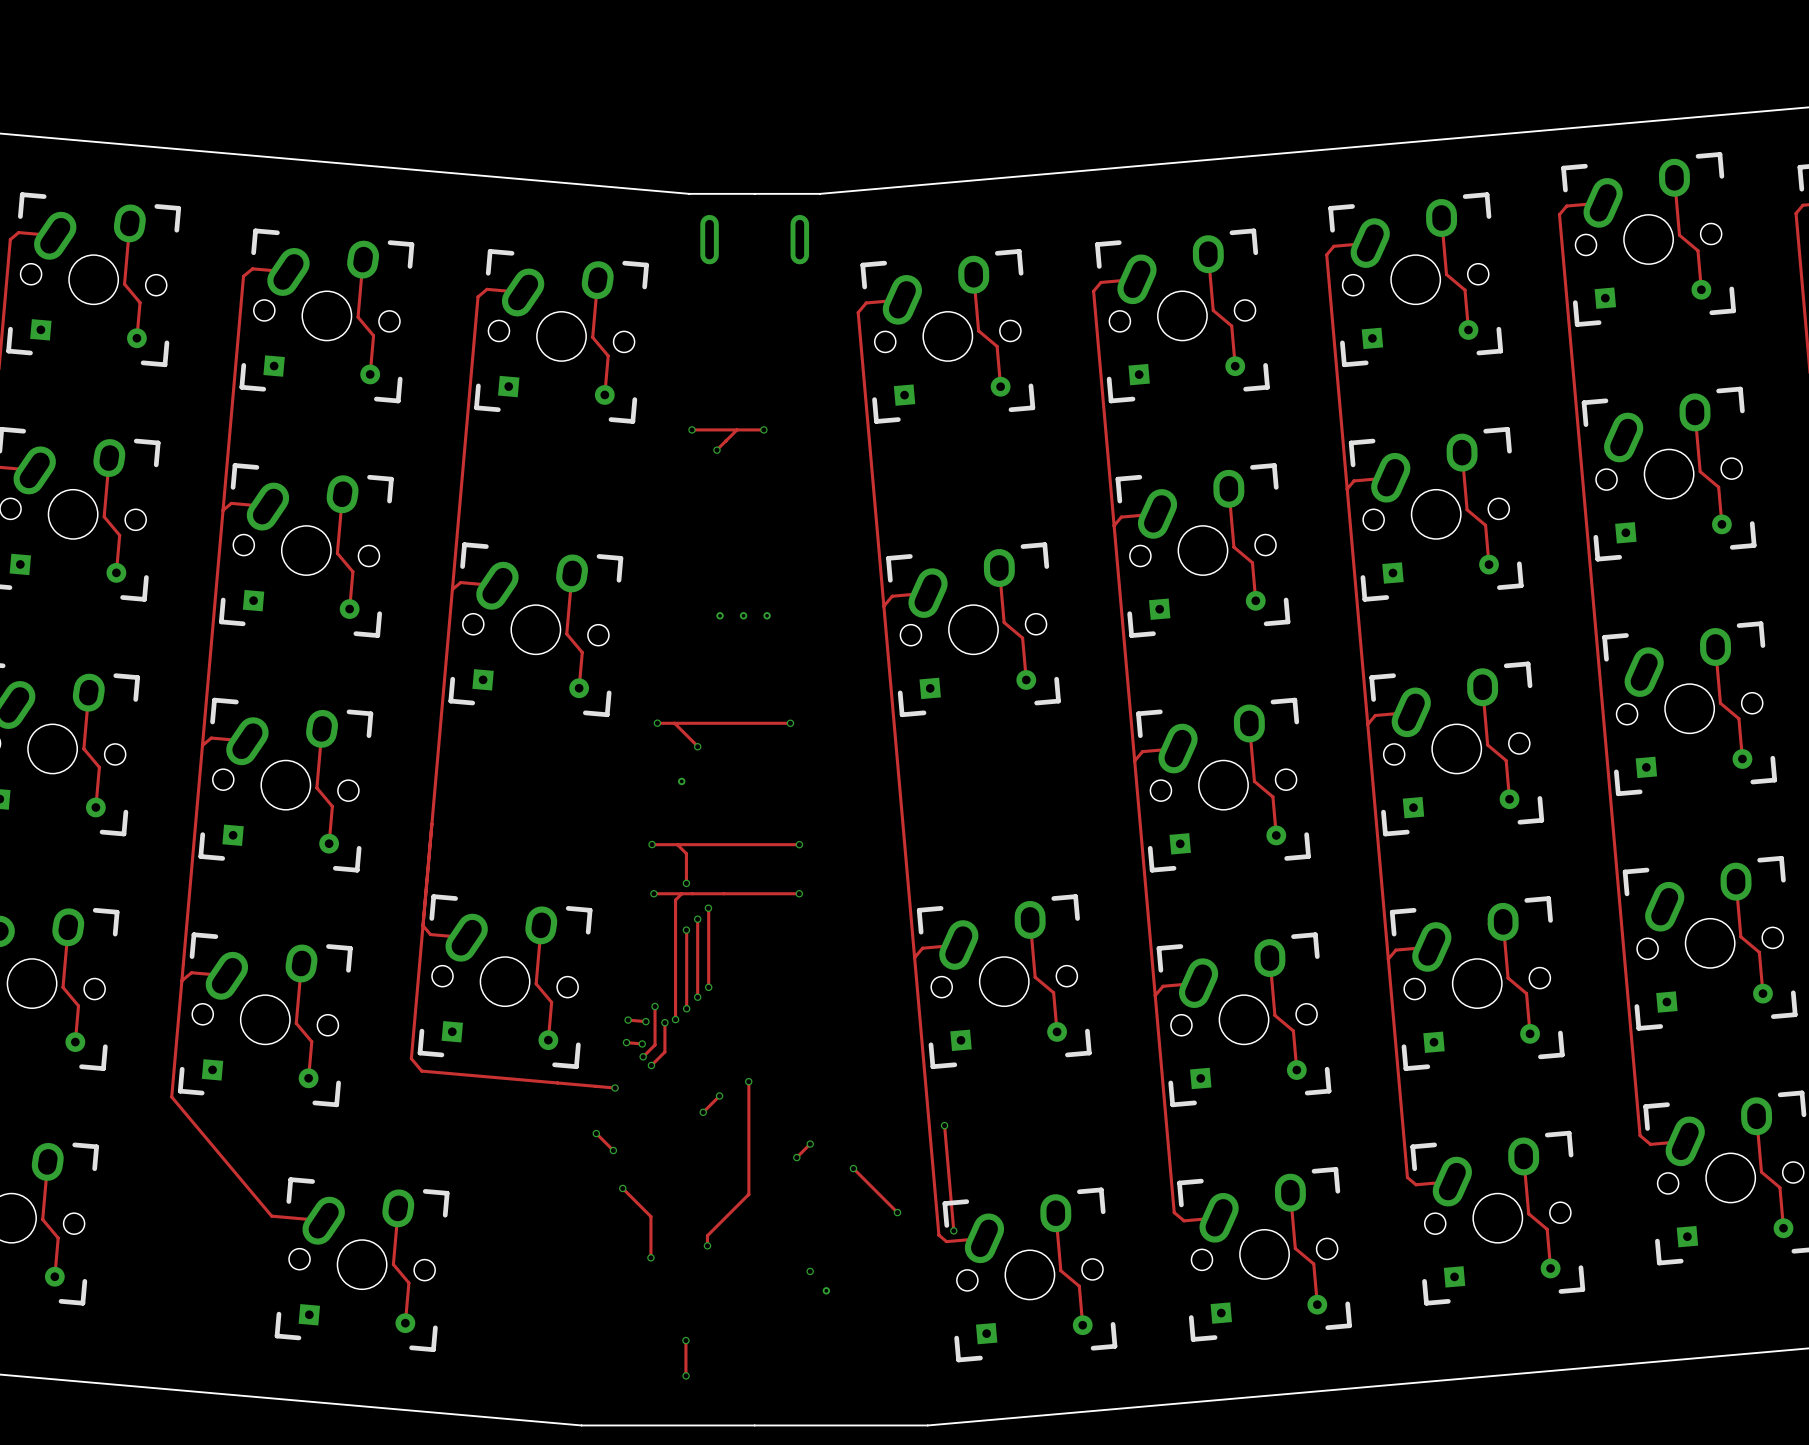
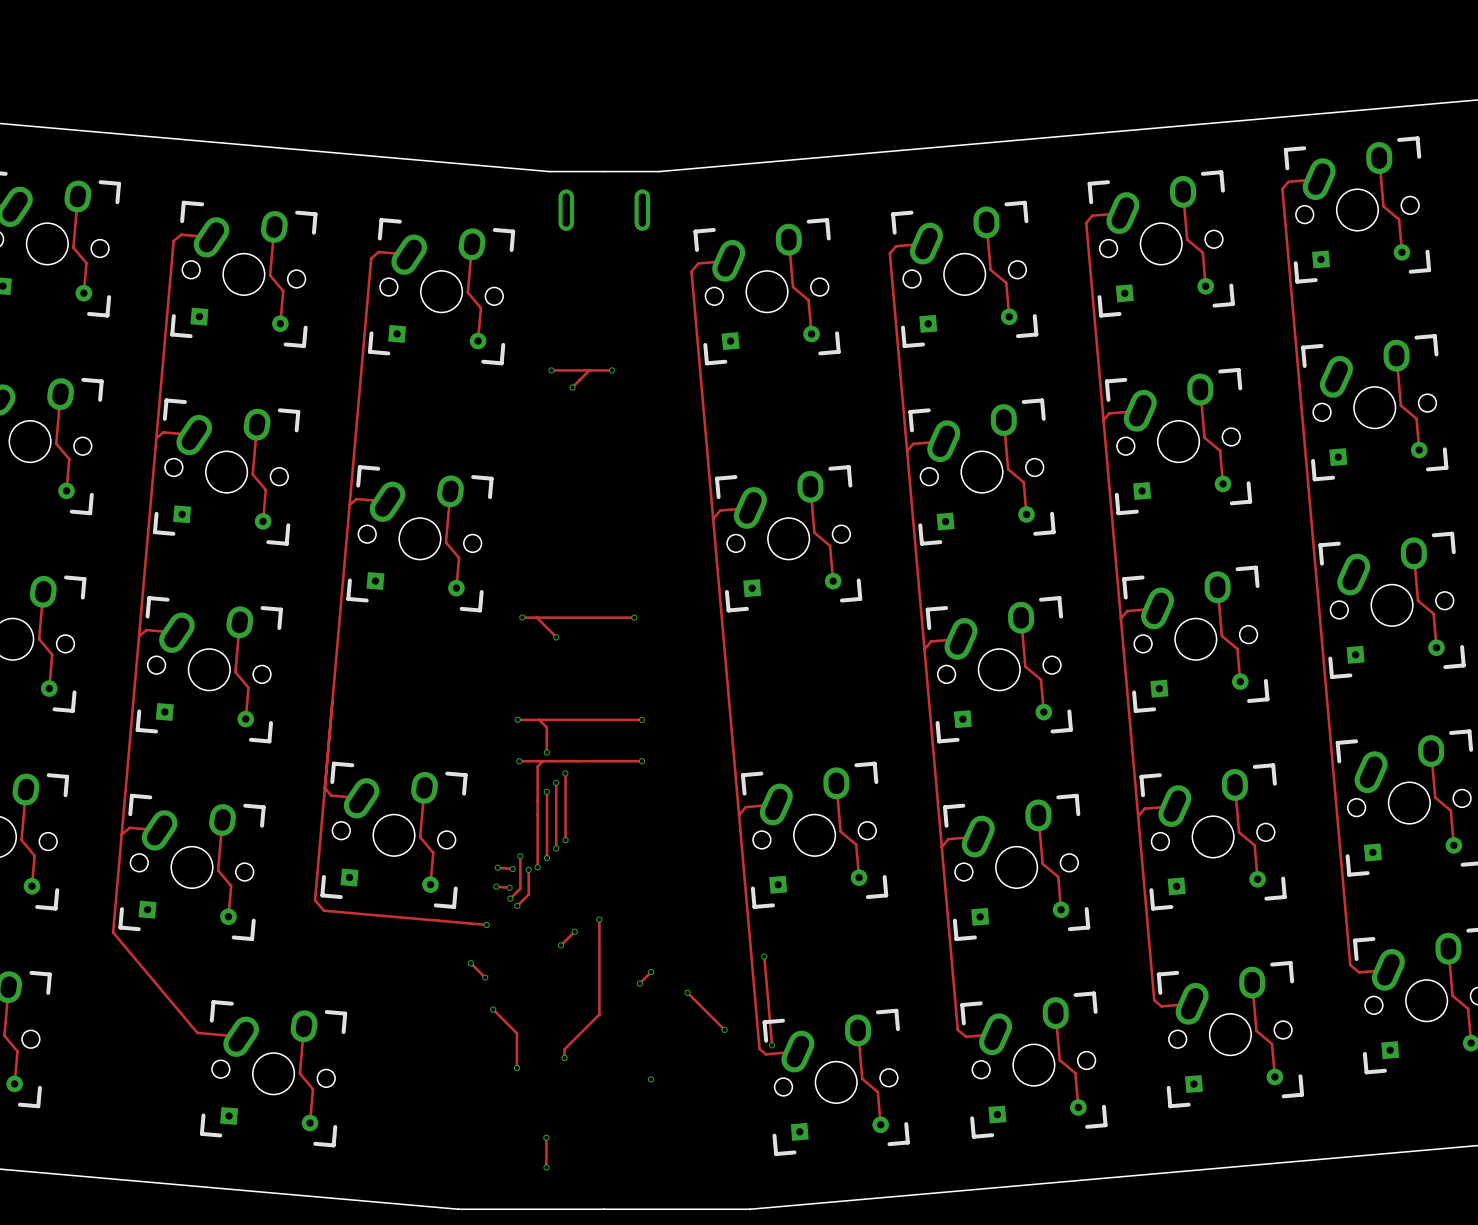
part: (720, 615) -> none
part: (743, 615) -> none
part: (767, 615) -> none
part: (681, 781) -> none
part: (826, 1290) -> none

